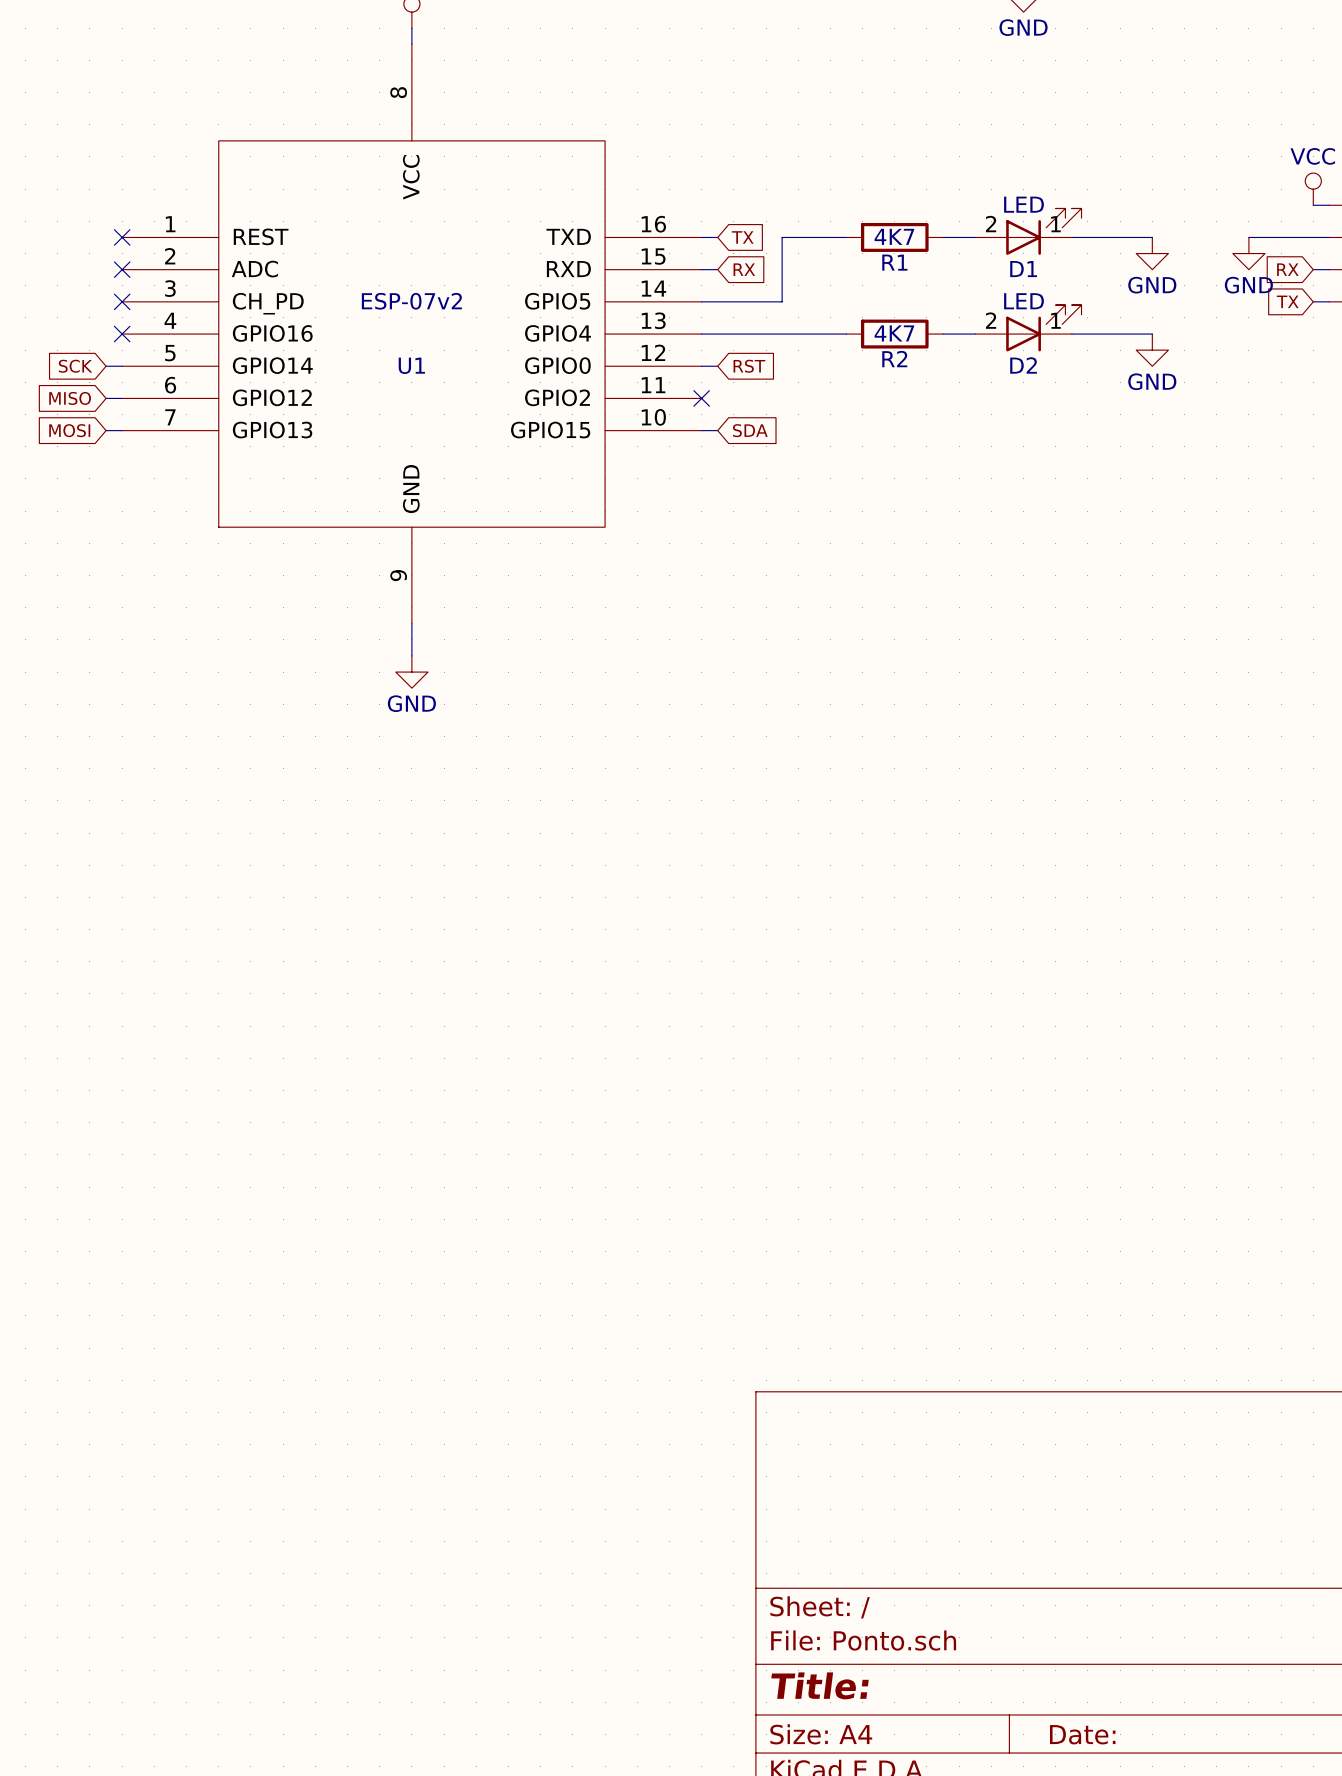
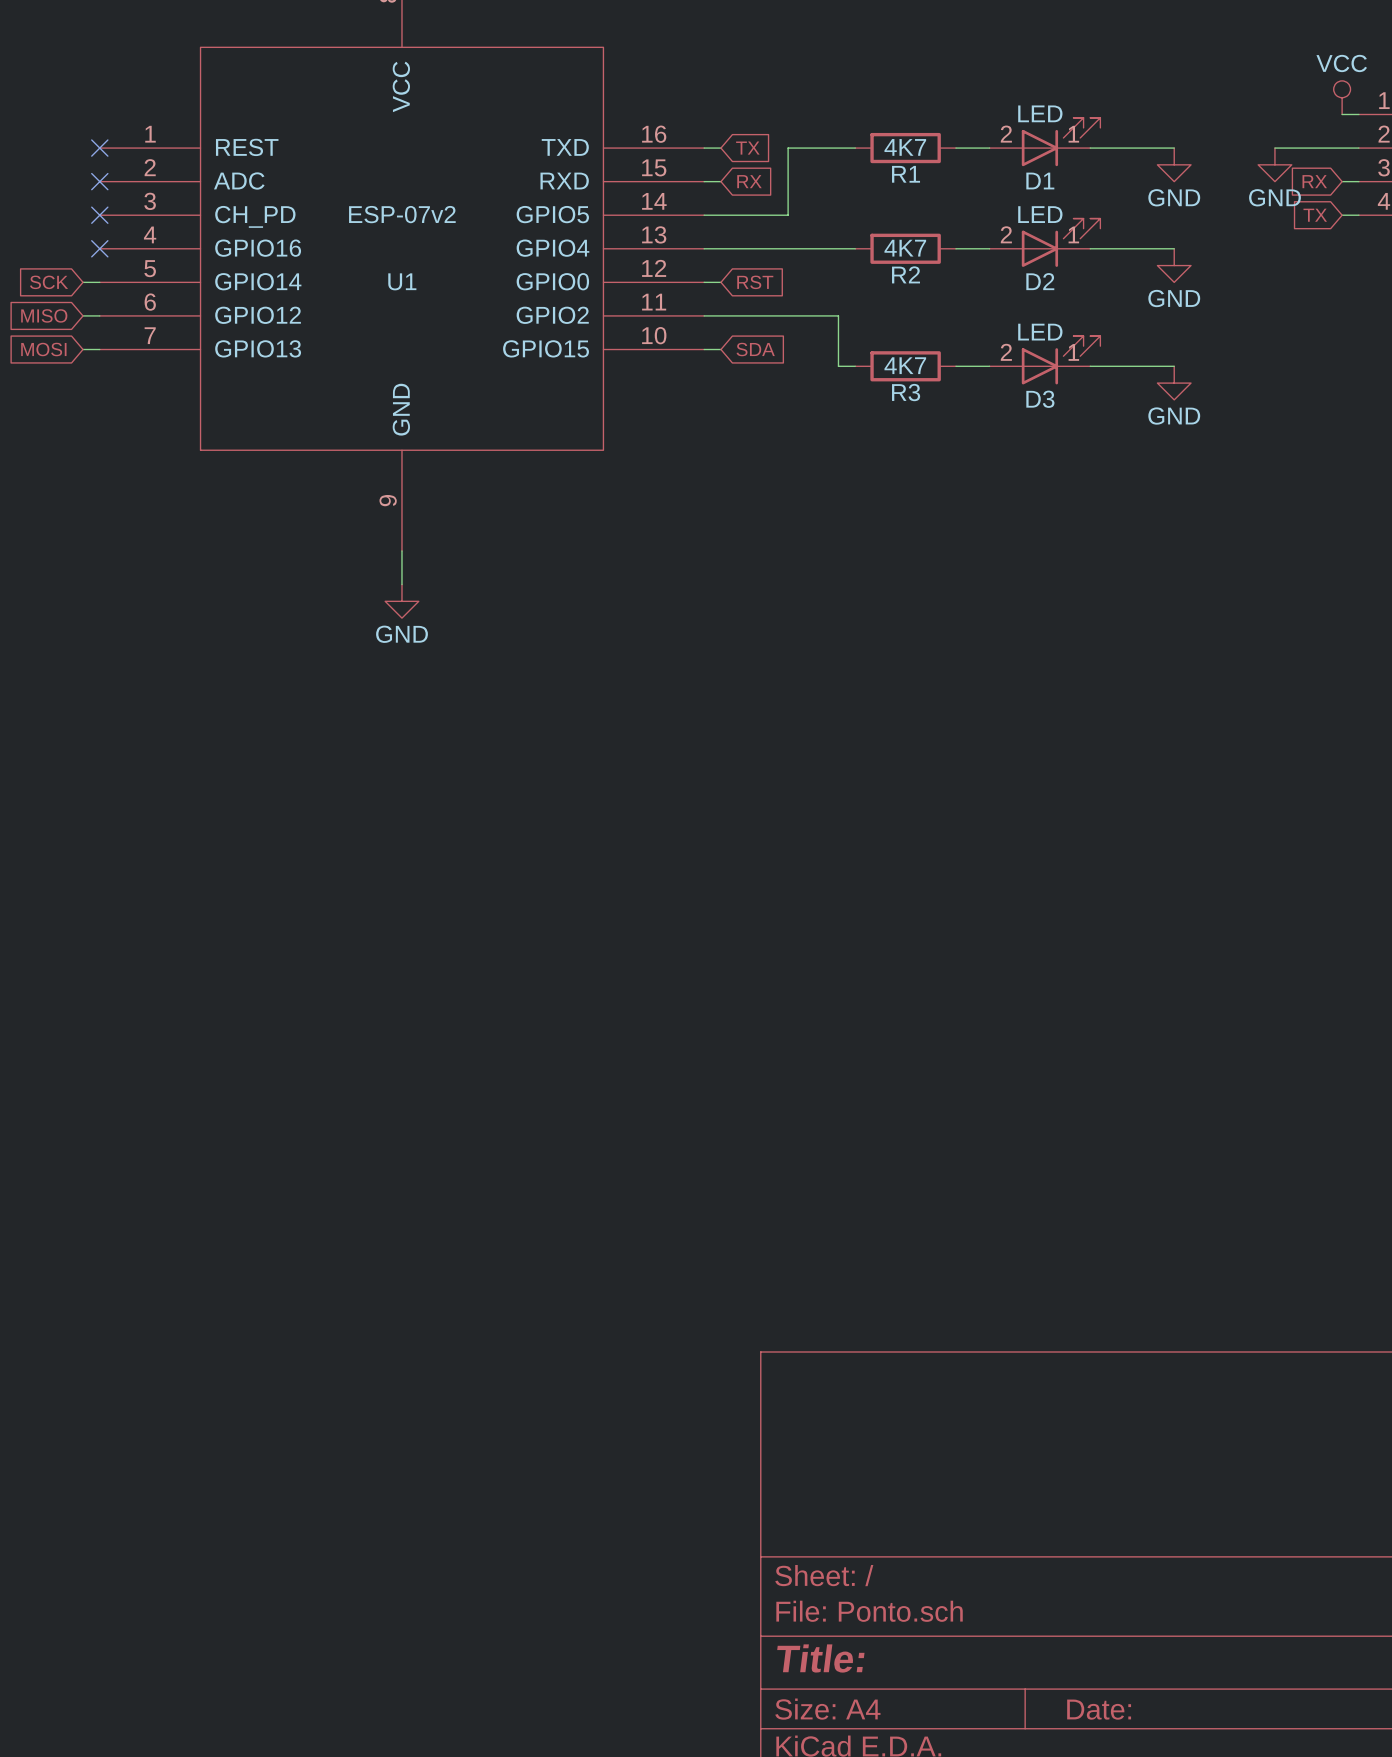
wire: none -> (704, 315) (838, 315) (838, 366) (855, 366)
no-connect mark: (701, 398) -> none
D3: none -> LED (1044, 360)
R3: none -> 4K7 (905, 366)
wire: none -> (955, 366) (989, 366)
wire: none -> (1090, 366) (1174, 366)
power symbol: none -> GND (1174, 383)

